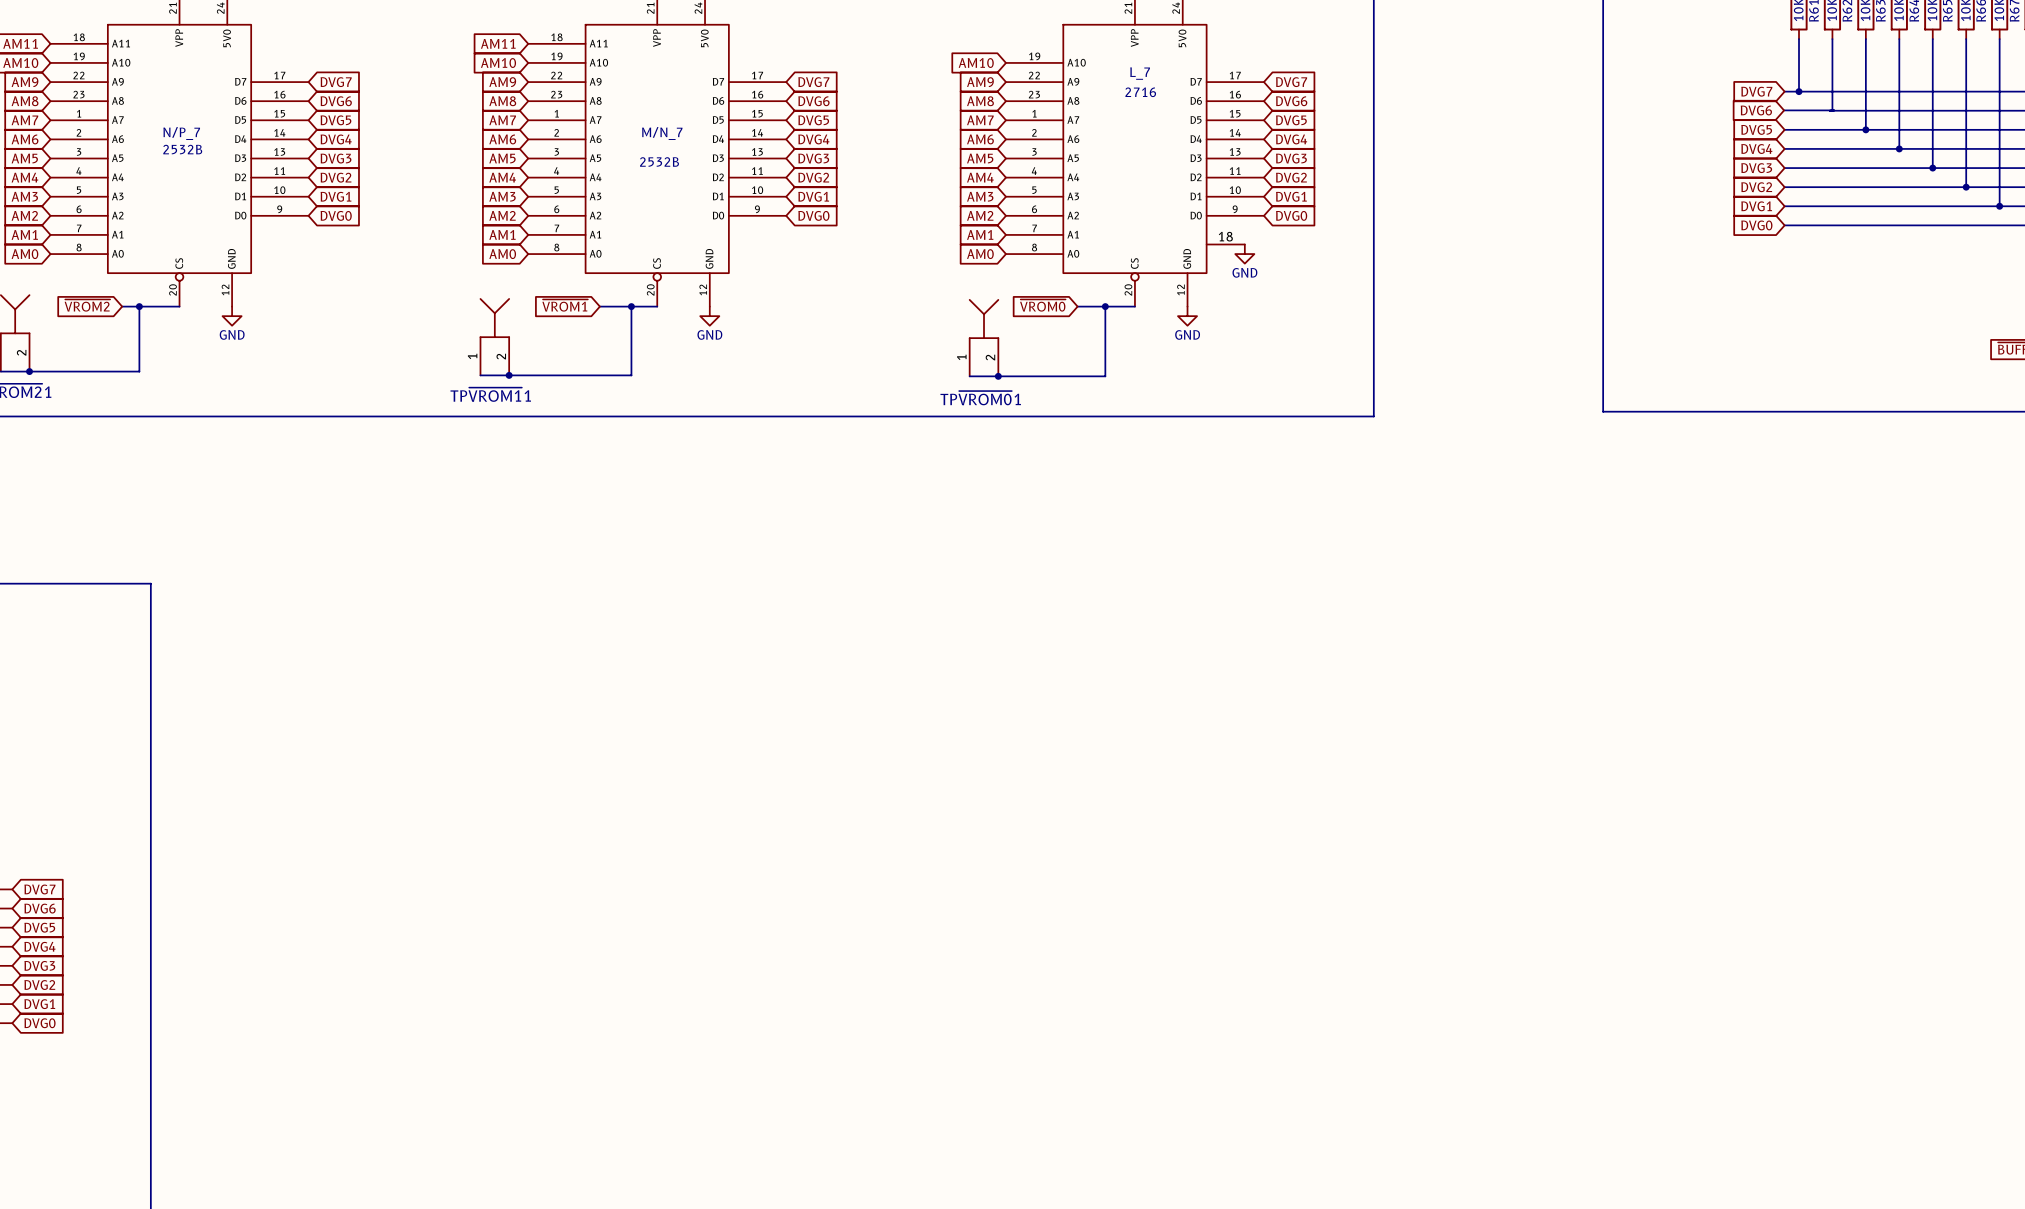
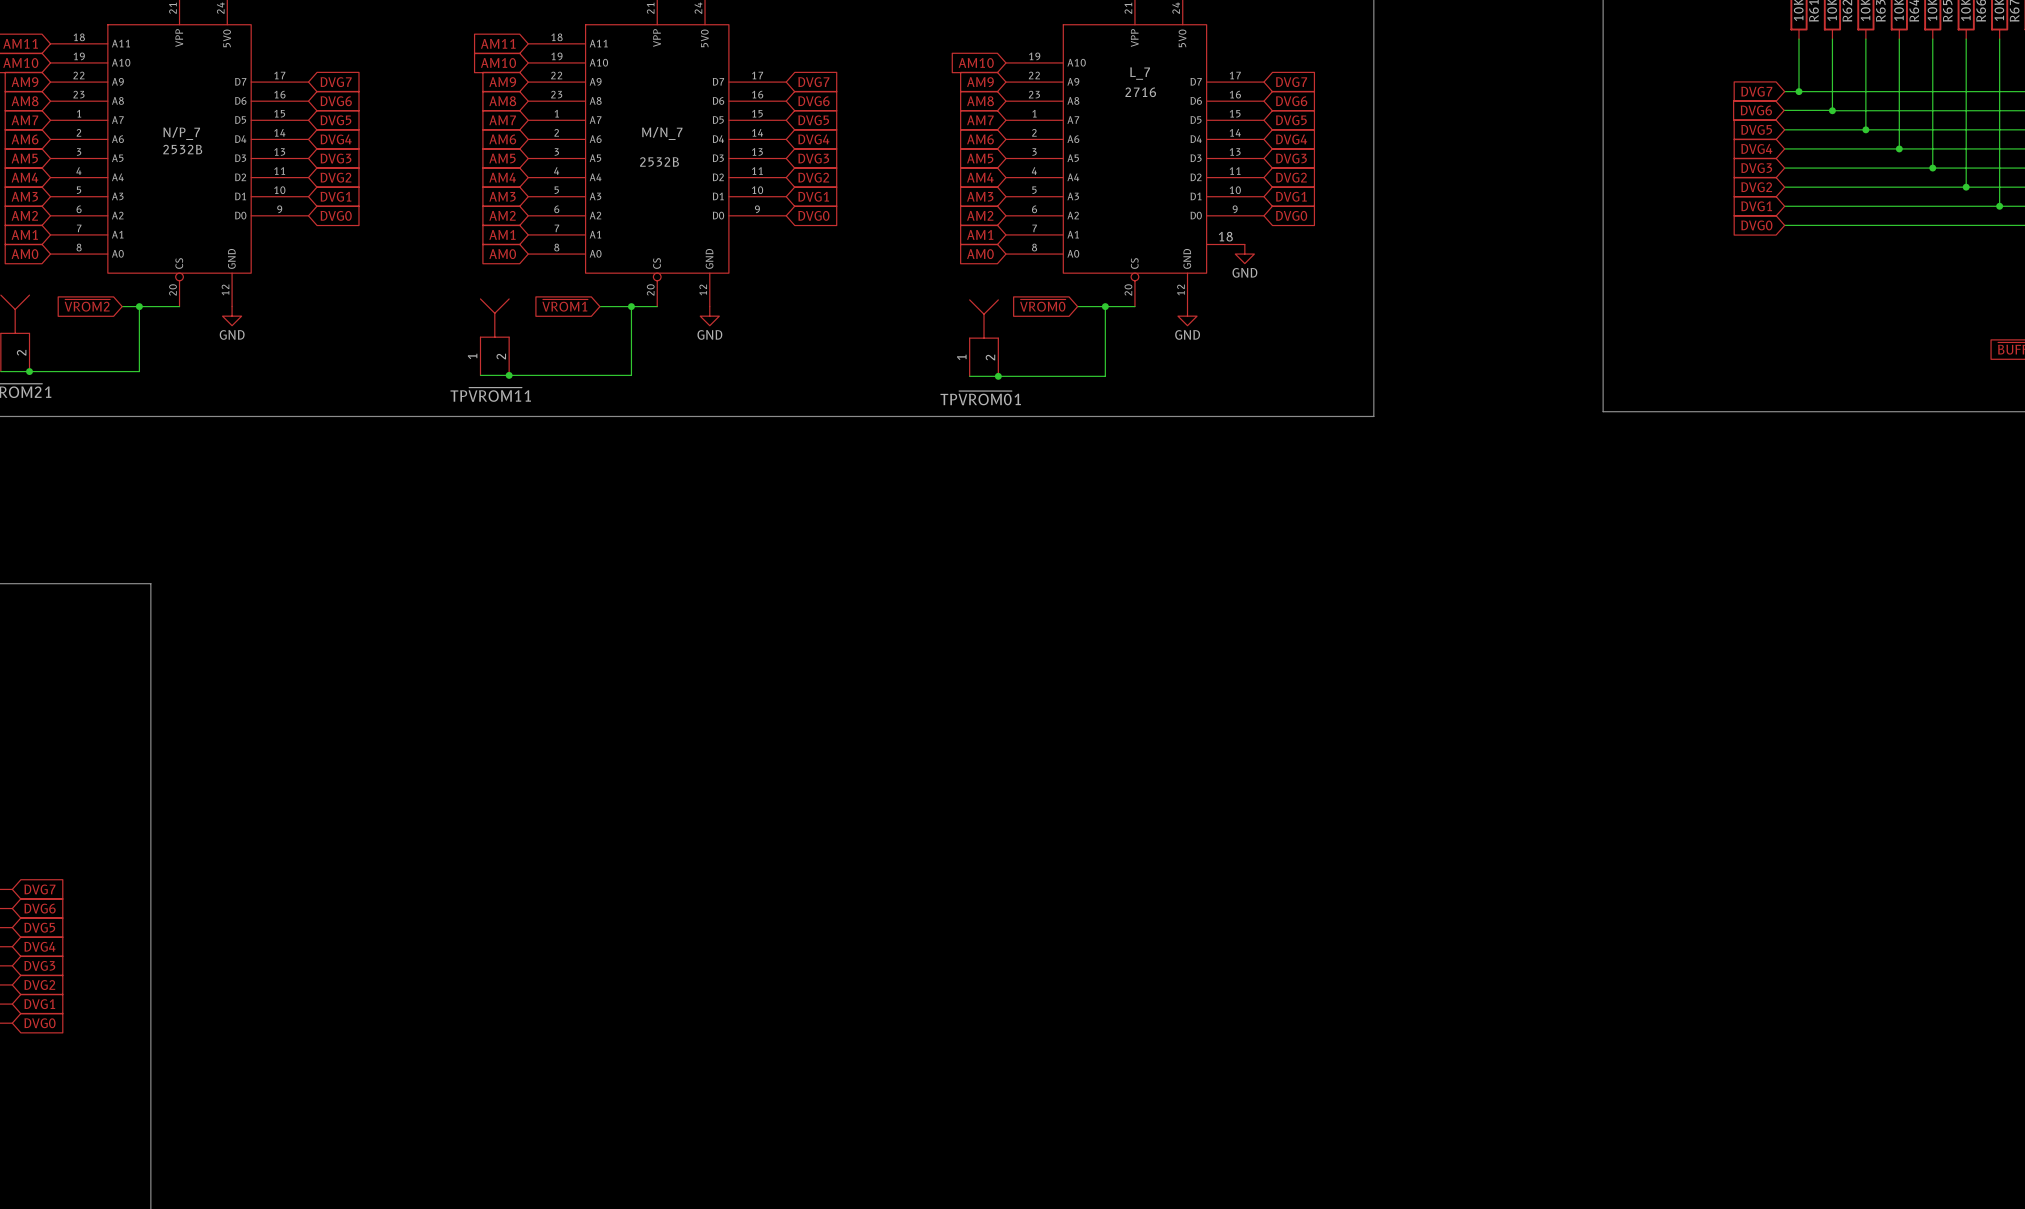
junction: none -> (1832, 110)

